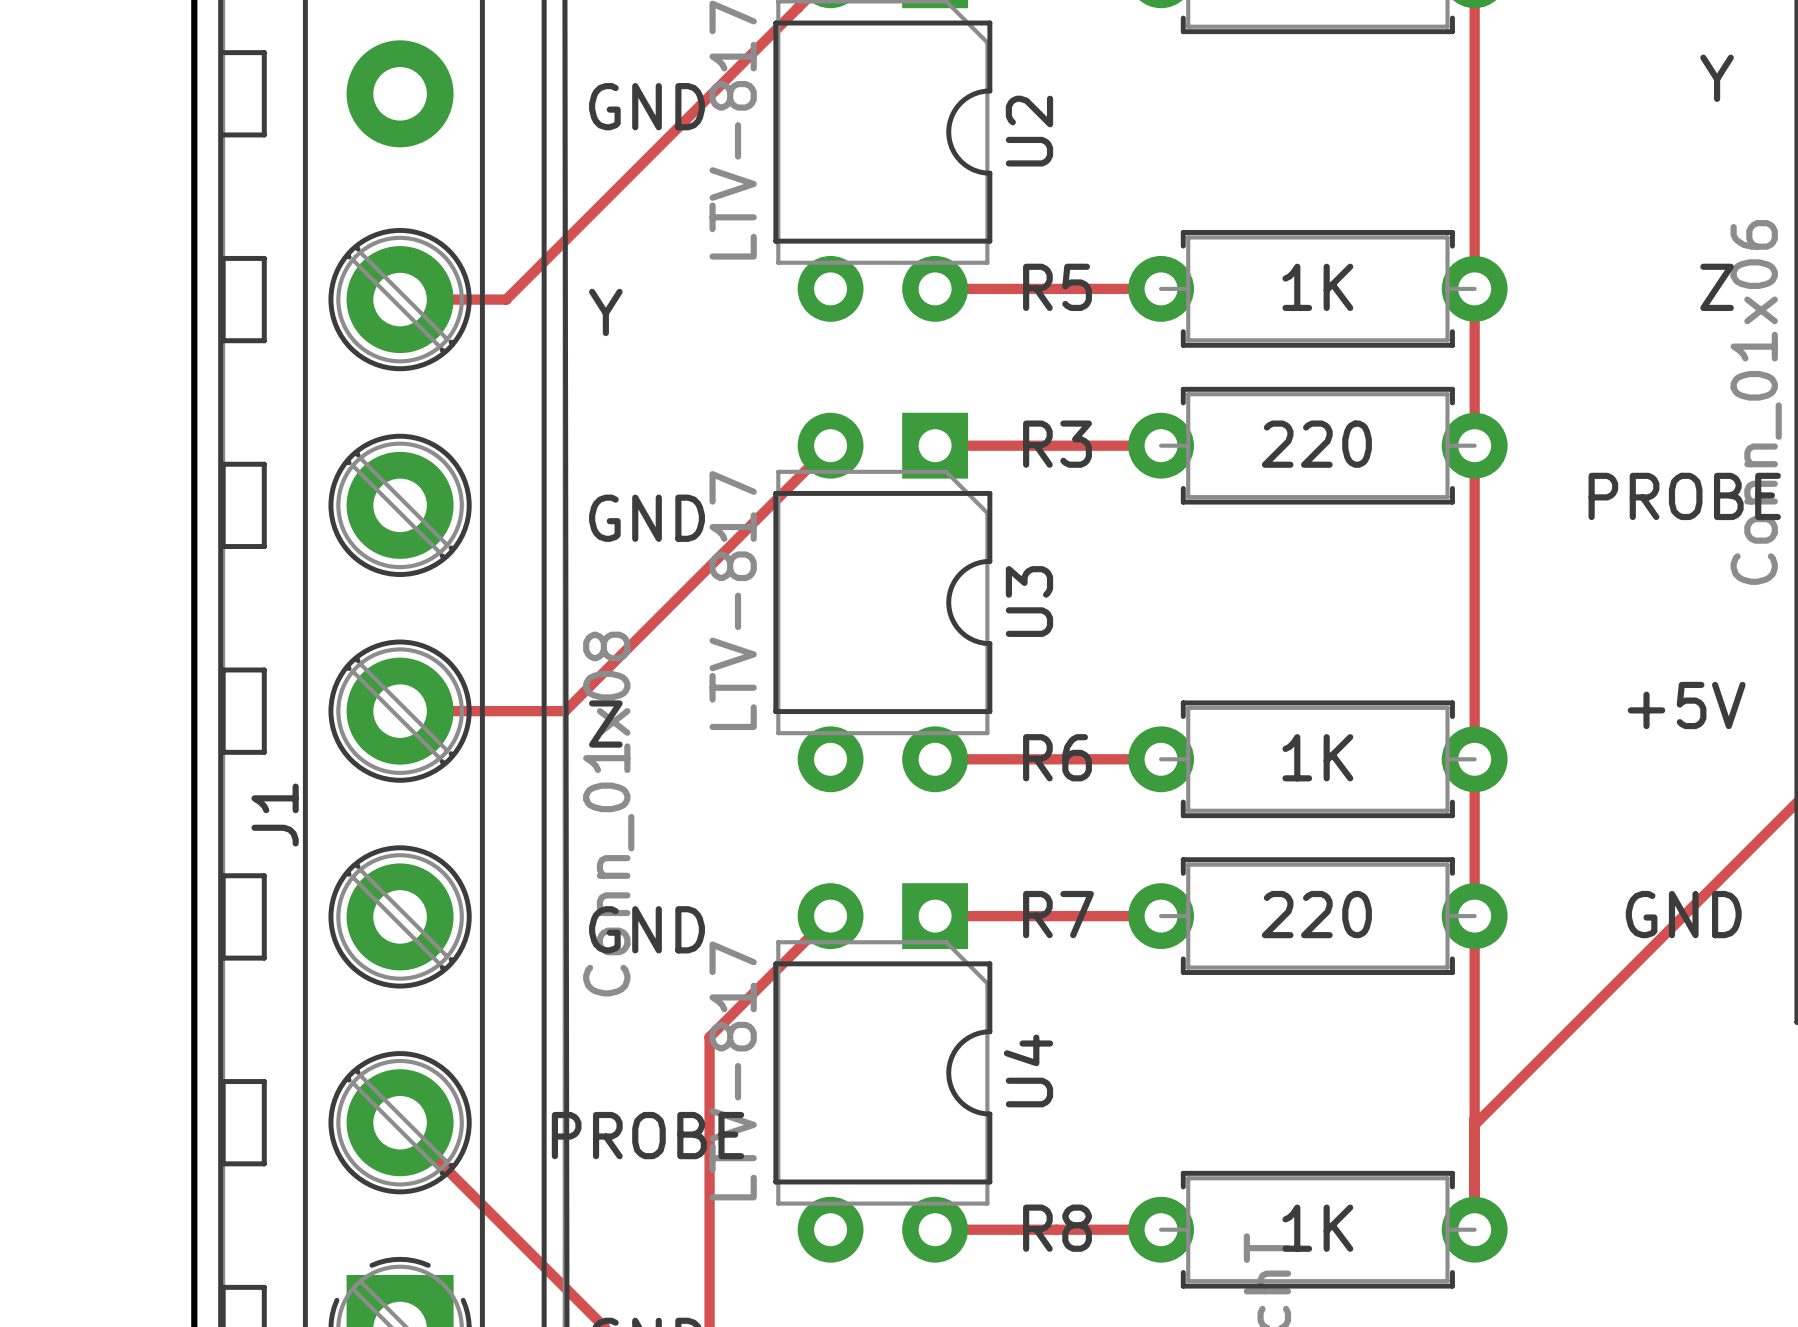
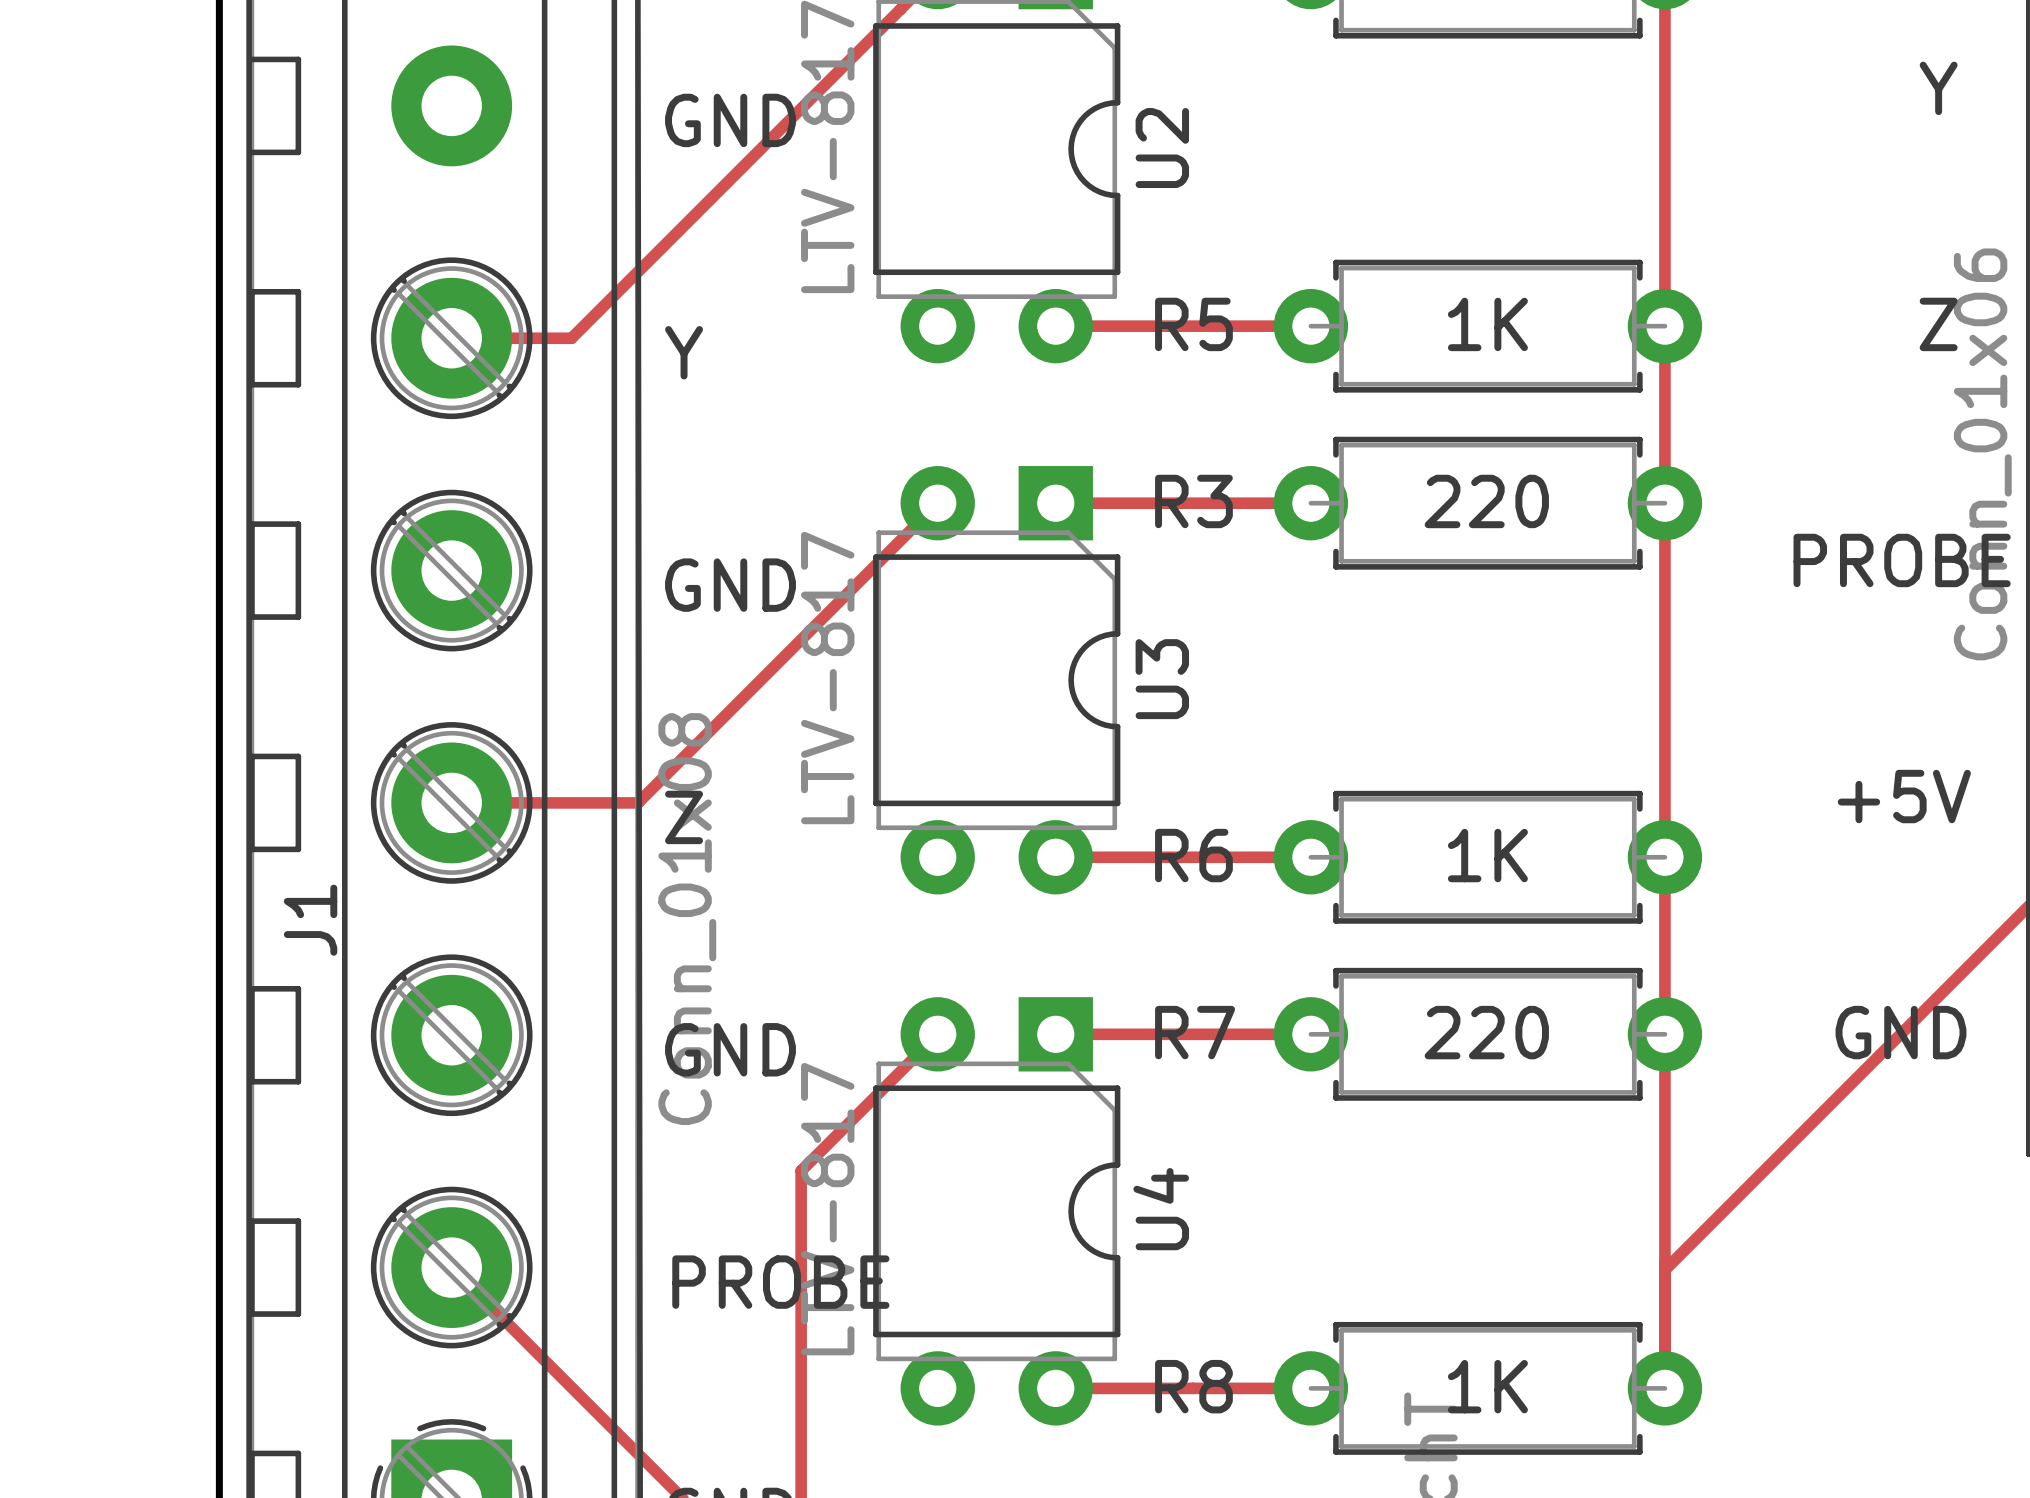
text position: PROBE (648, 1135) -> PROBE (780, 1282)

